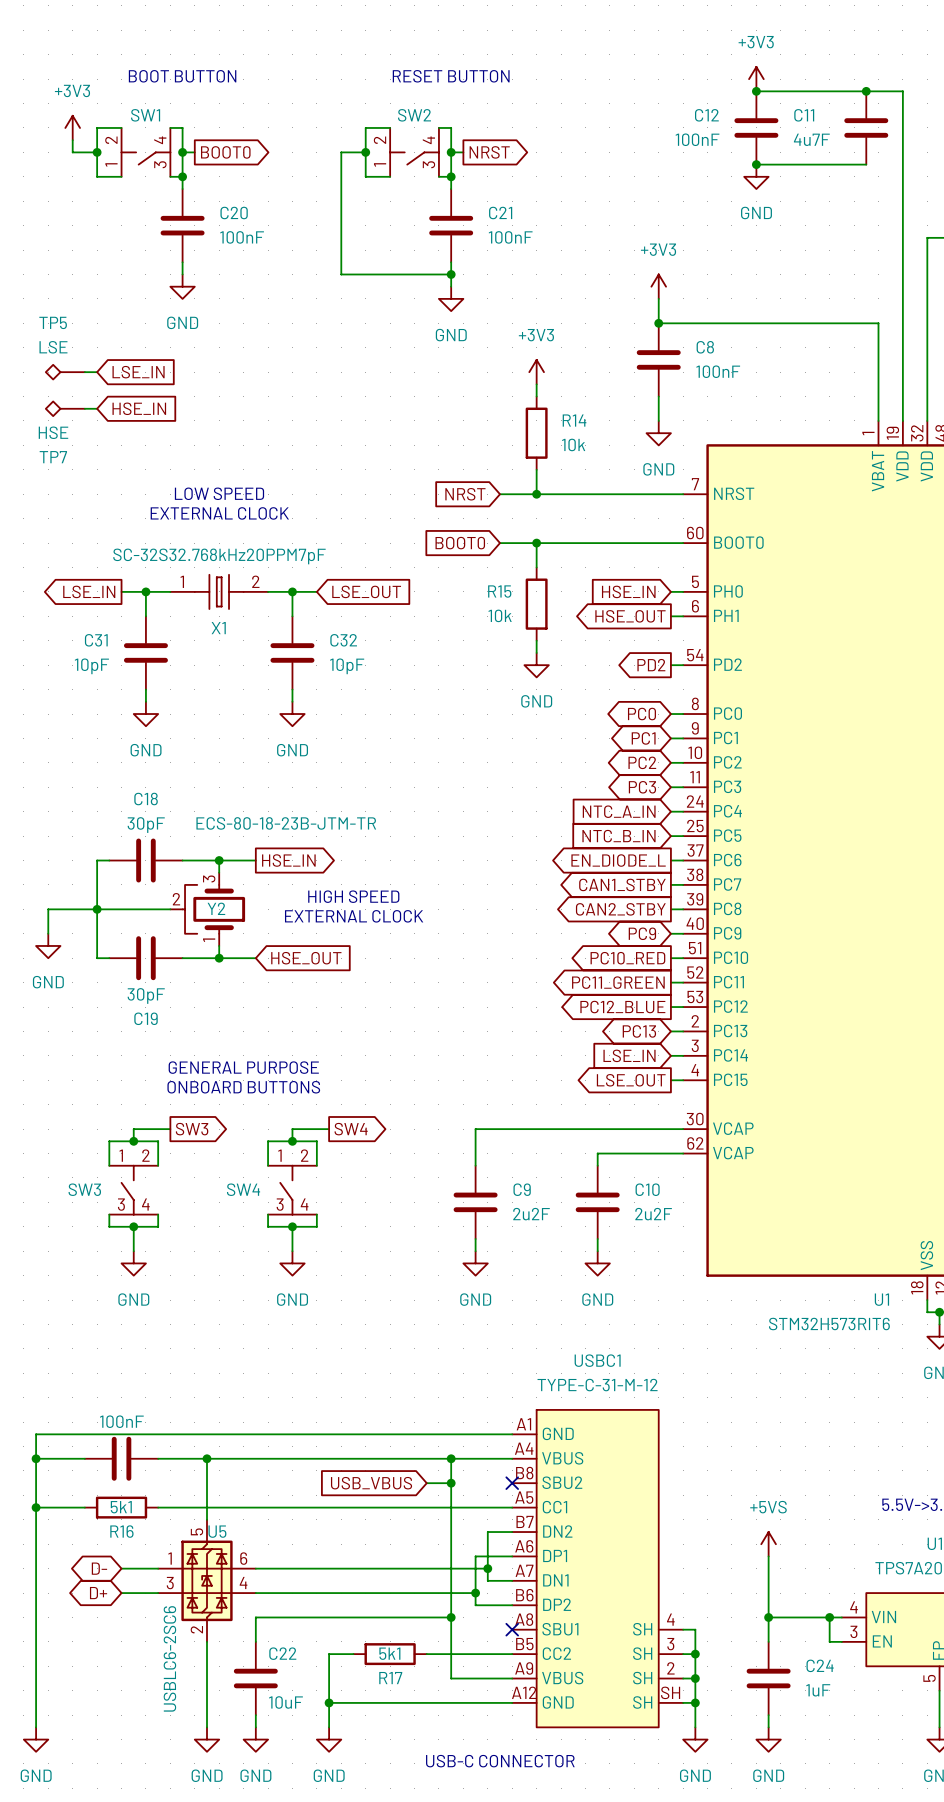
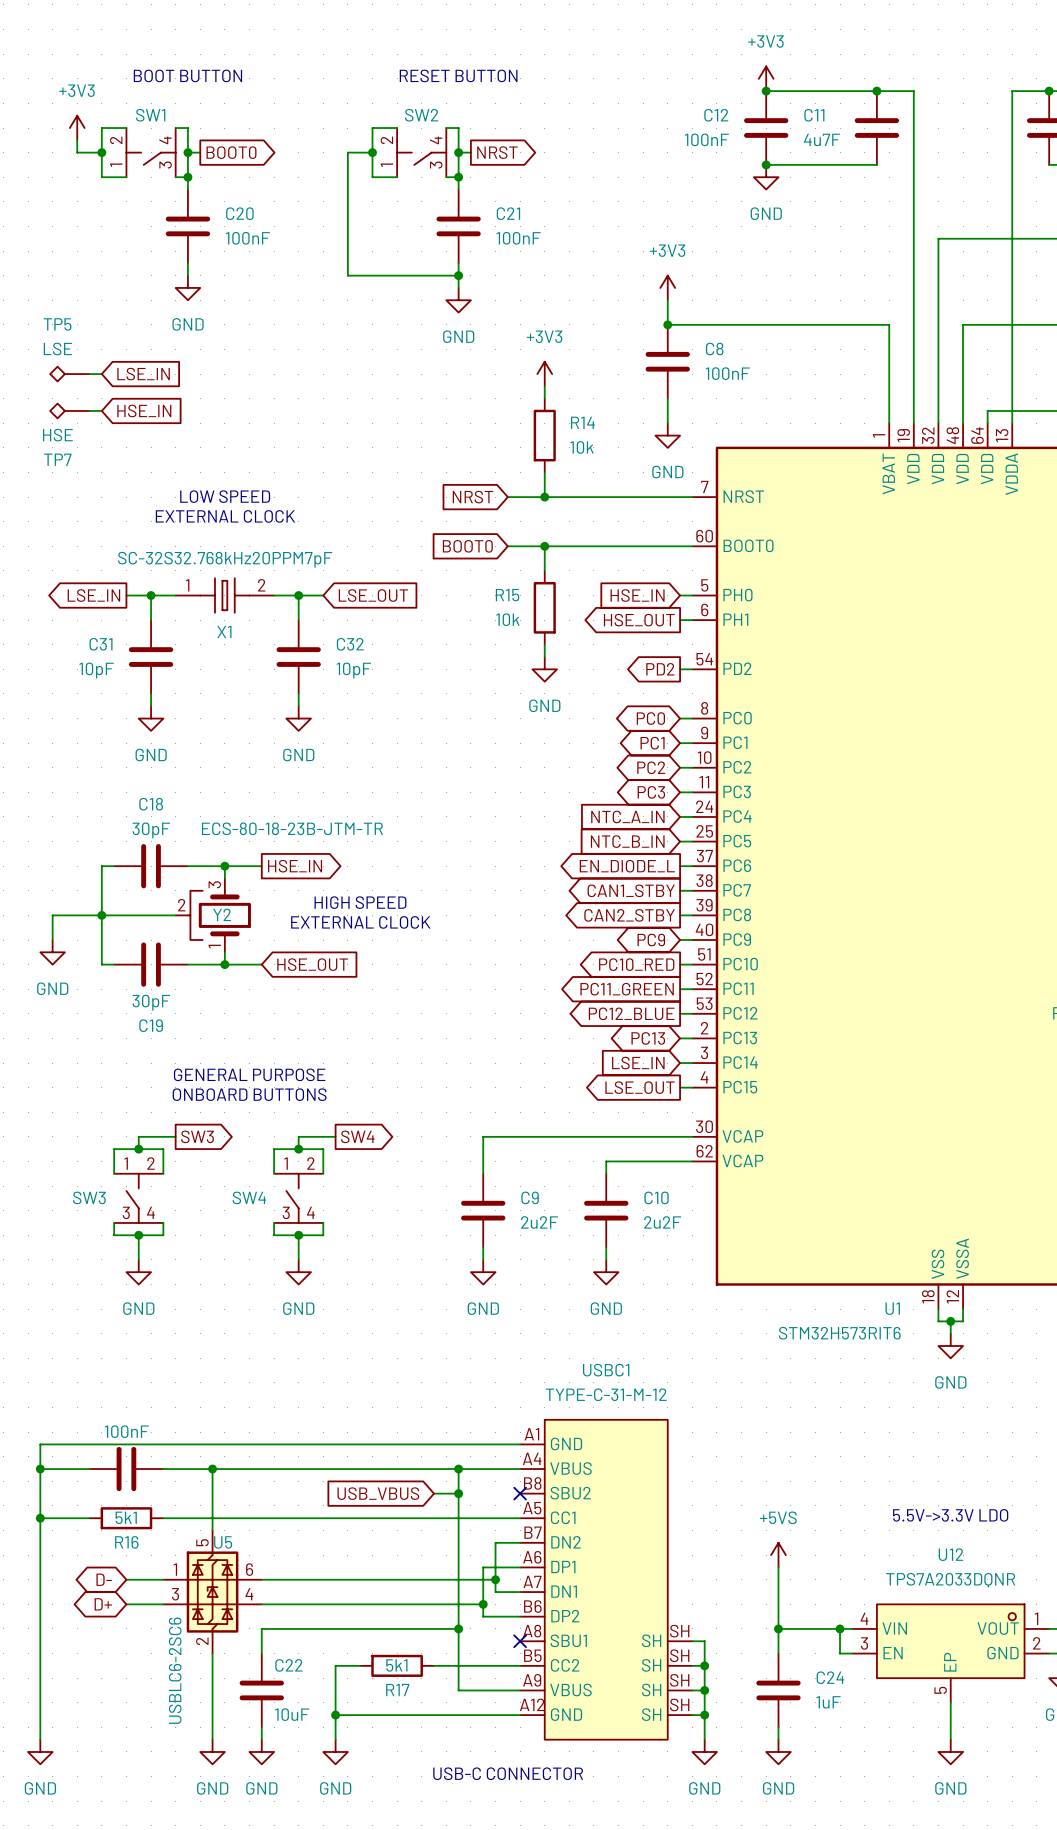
USBC1 pin number: 4 (670, 1619) -> SH (679, 1631)
USBC1 pin number: 3 (670, 1644) -> SH (679, 1655)
USBC1 pin number: 2 (670, 1668) -> SH (679, 1680)

